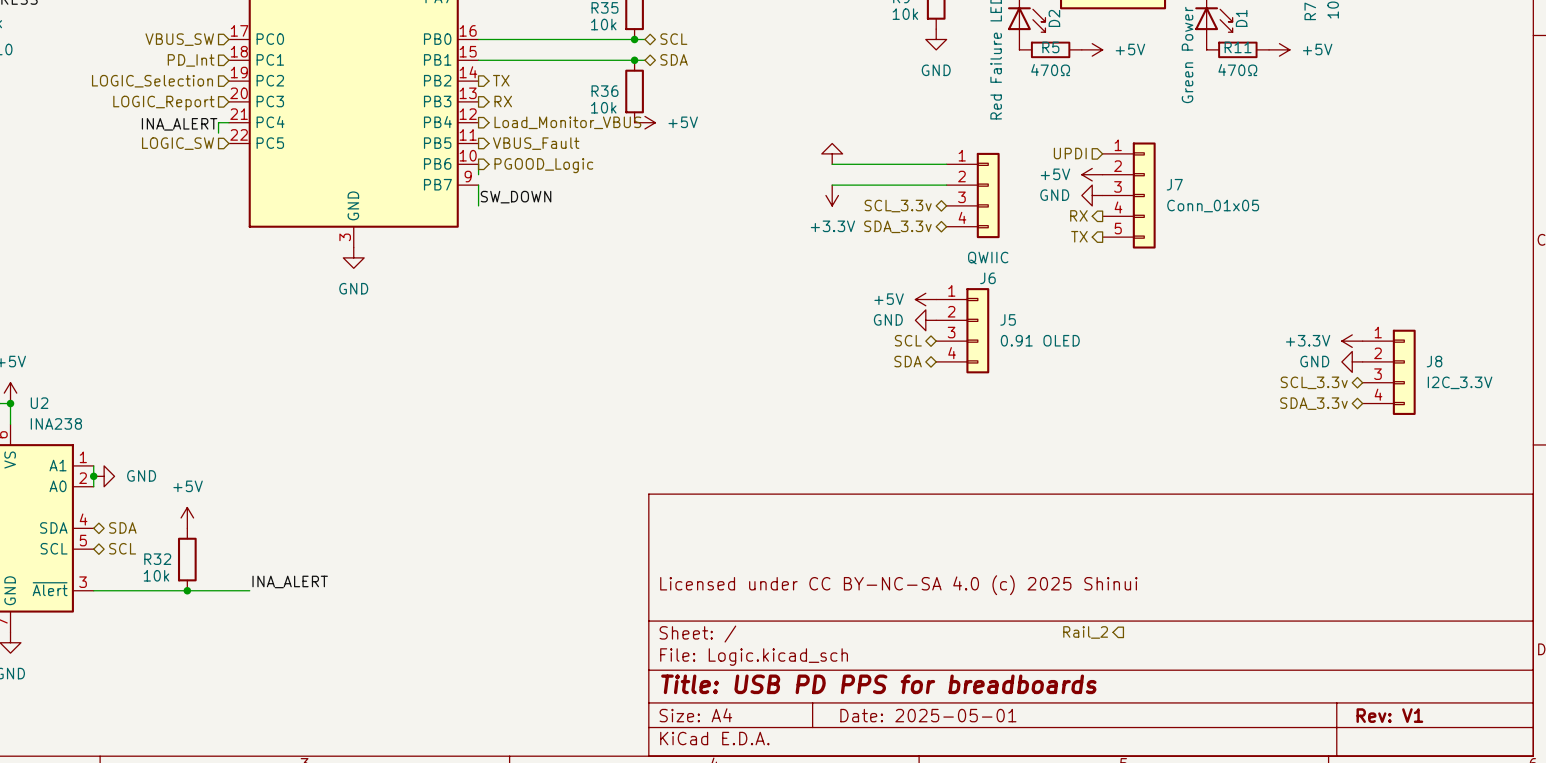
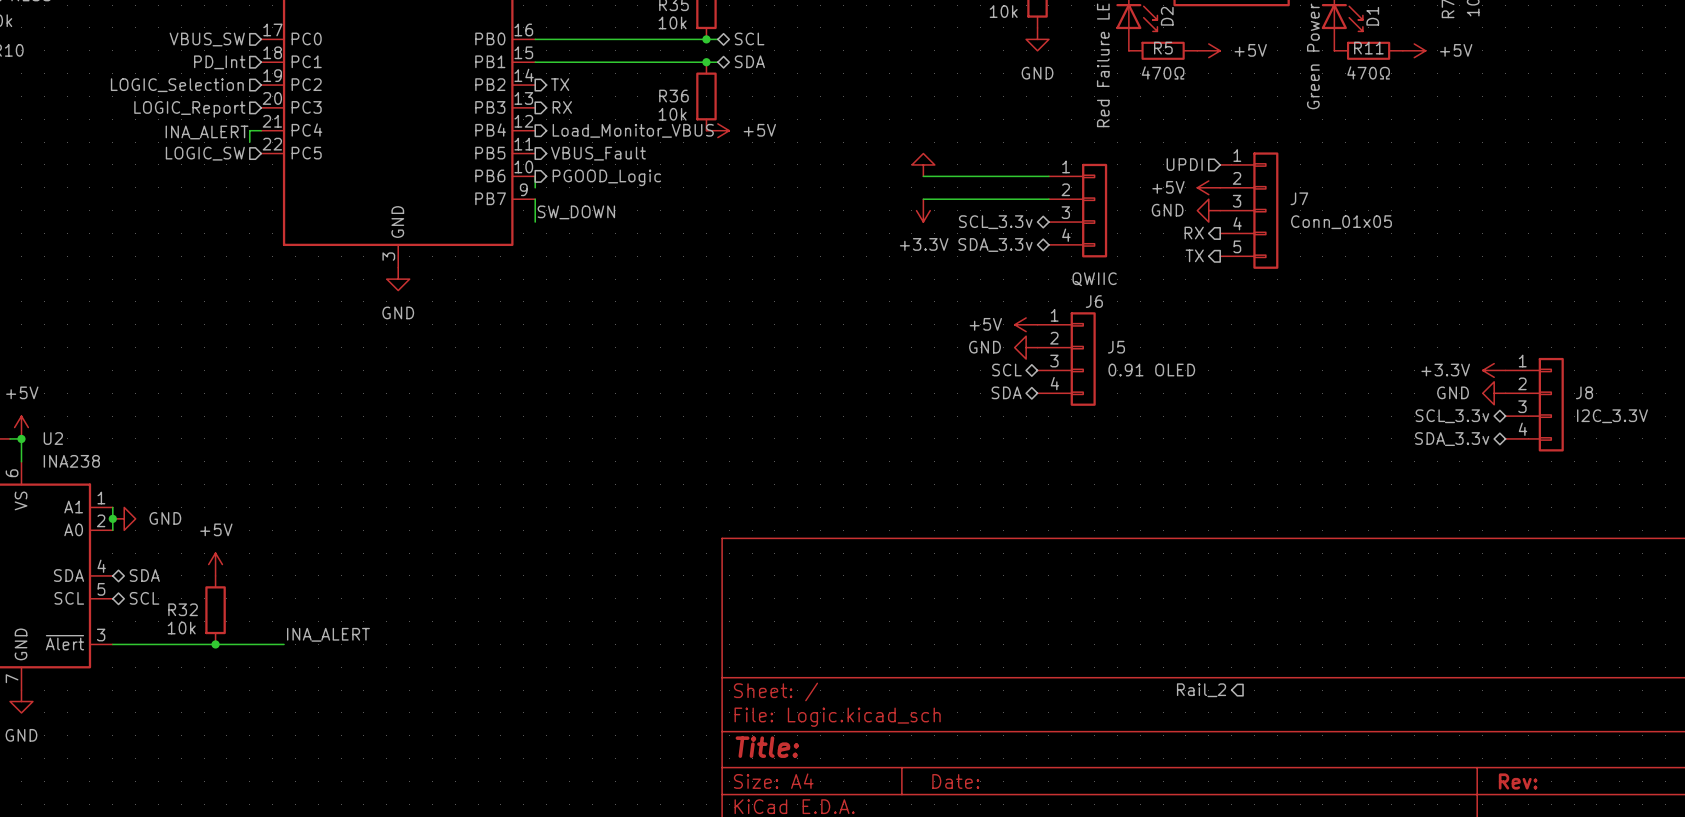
title block: Licensed under CC BY-NC-SA 4.0 (c) 2025 Shinui (898, 585) -> none
title block: Title: USB PD PPS for breadboards (878, 684) -> Title: (767, 747)
title block: Date: 2025-05-01 (928, 715) -> Date: (955, 781)
title block: Rev: V1 (1389, 715) -> Rev: (1518, 781)

